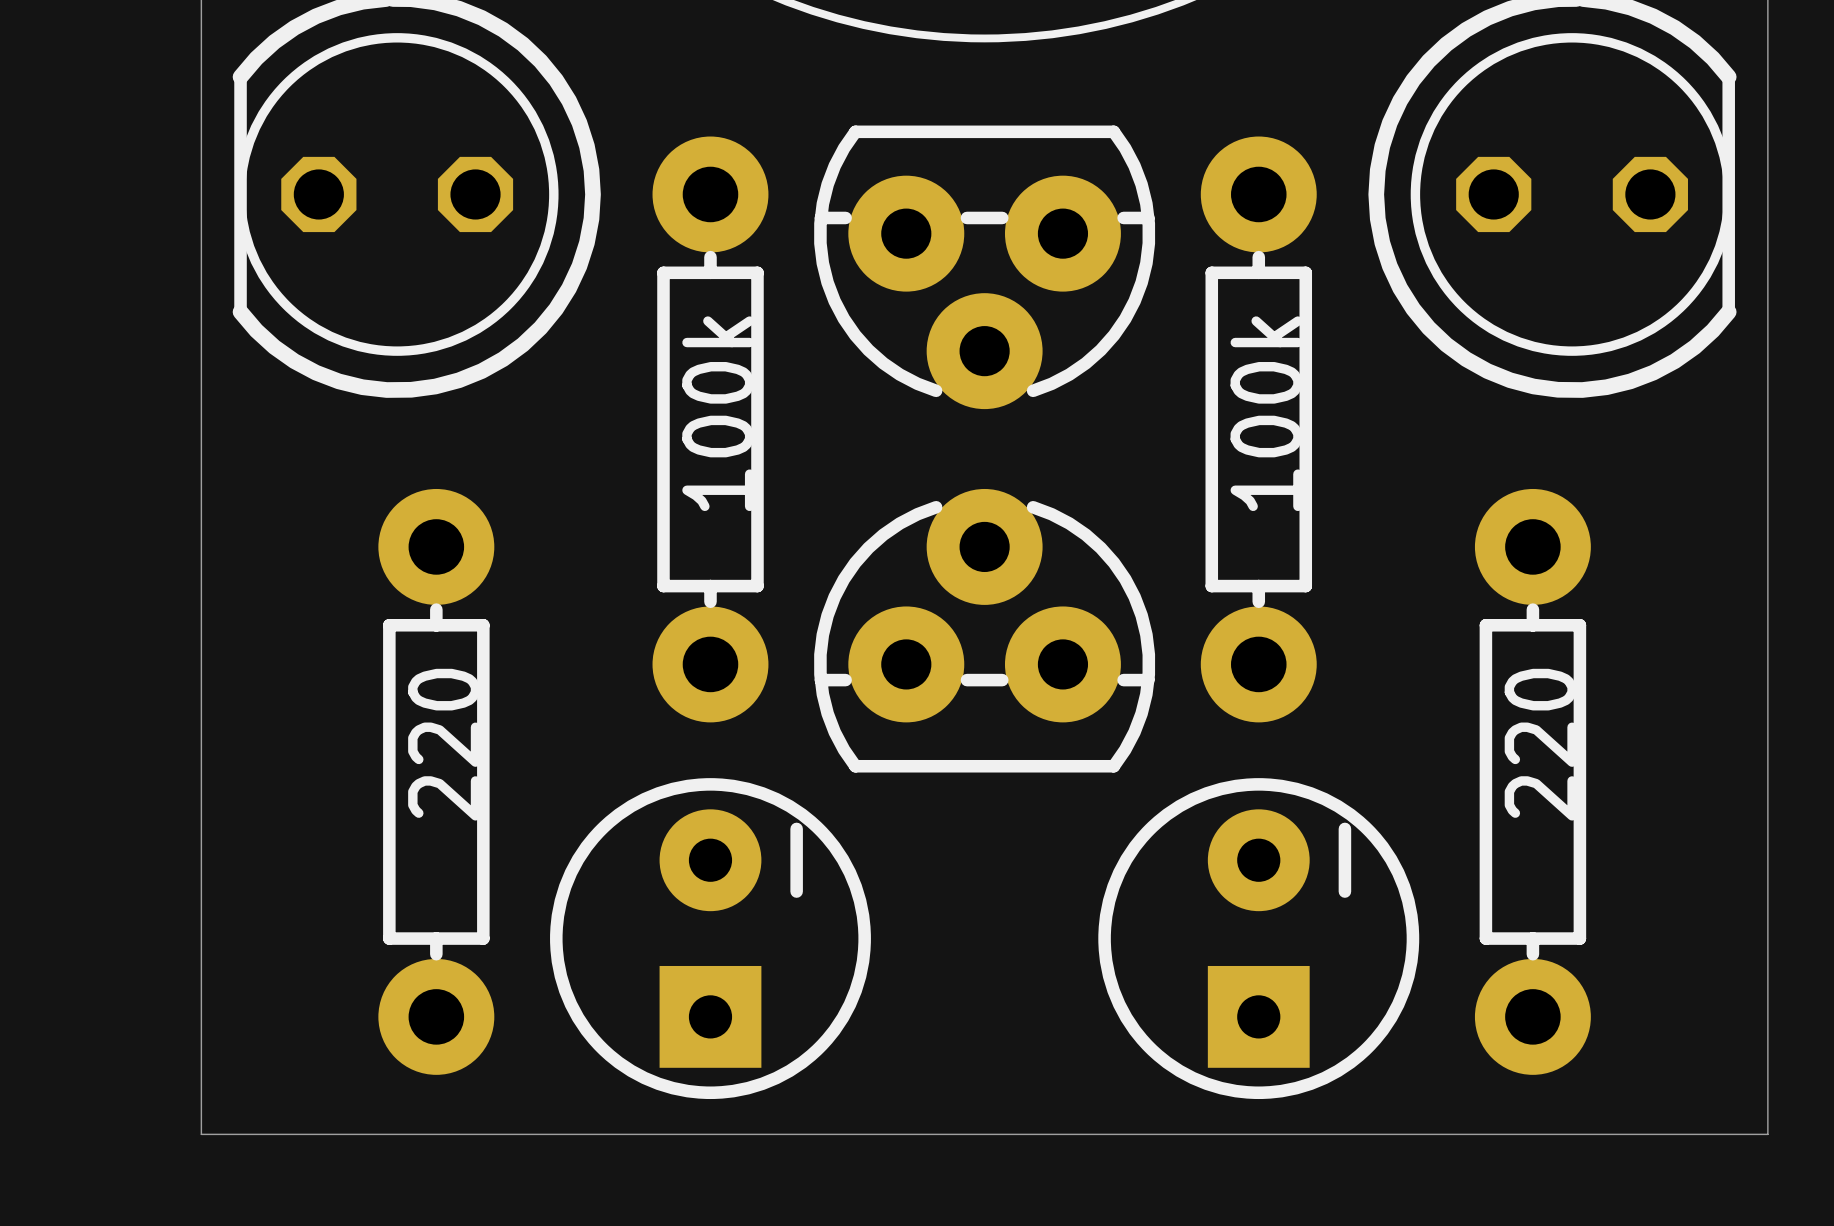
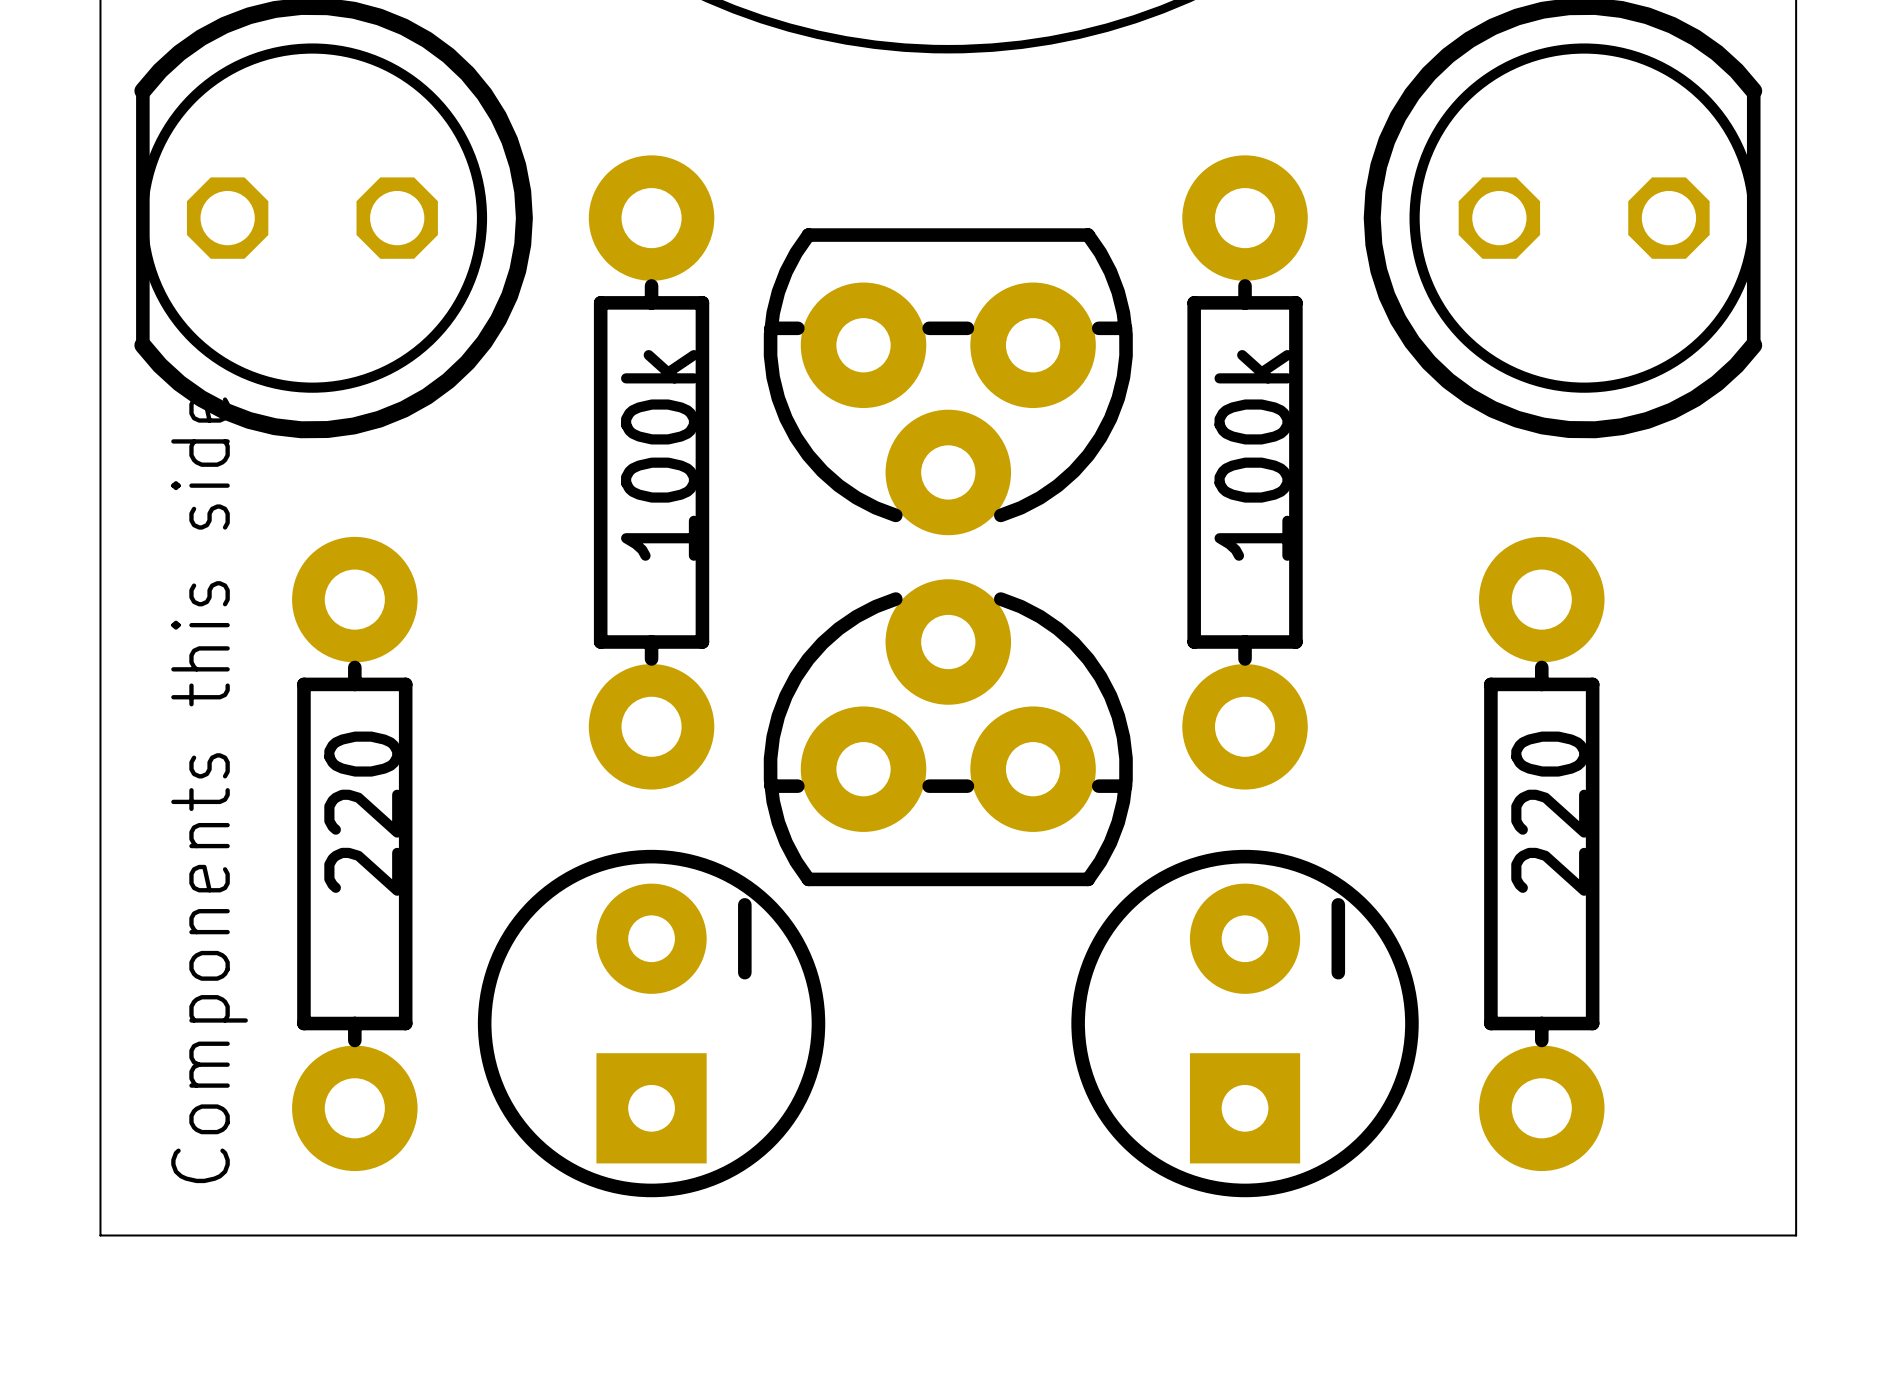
part position: (984, 267) -> (948, 381)
part position: (984, 630) -> (948, 732)
text: none -> Components this side (209, 789)

